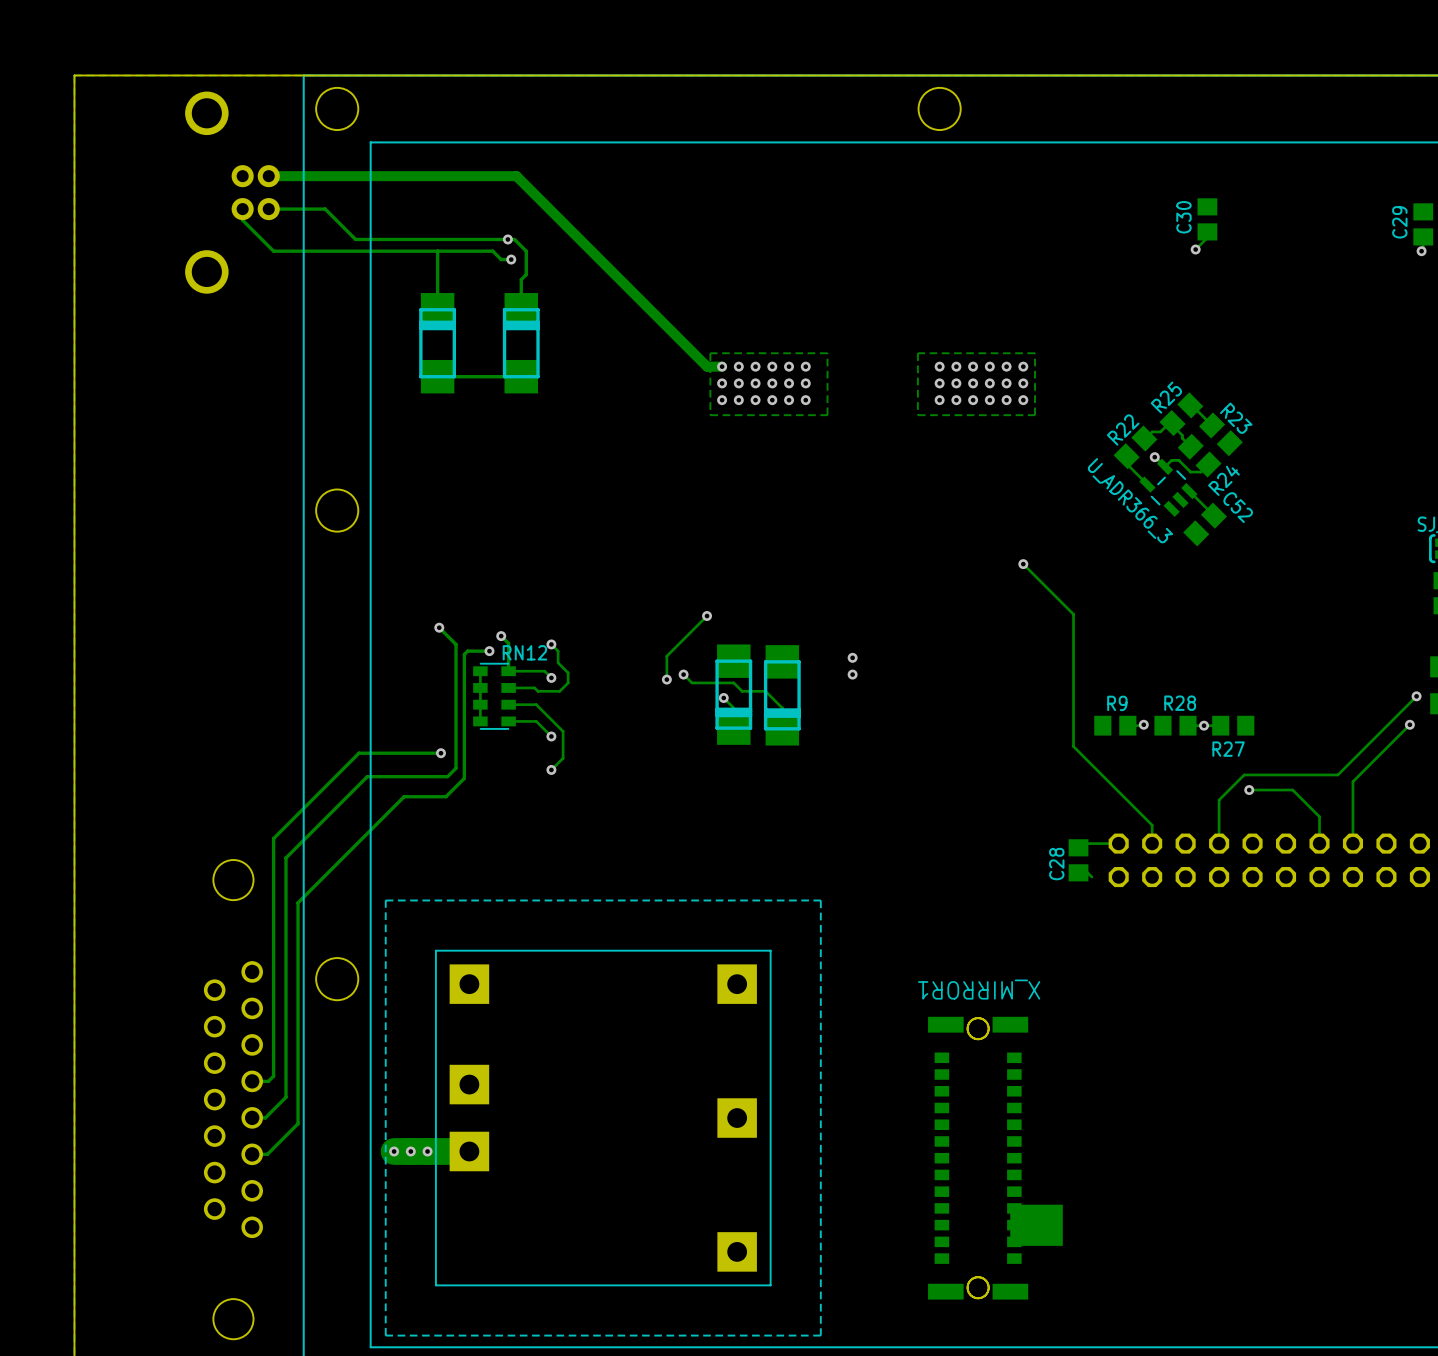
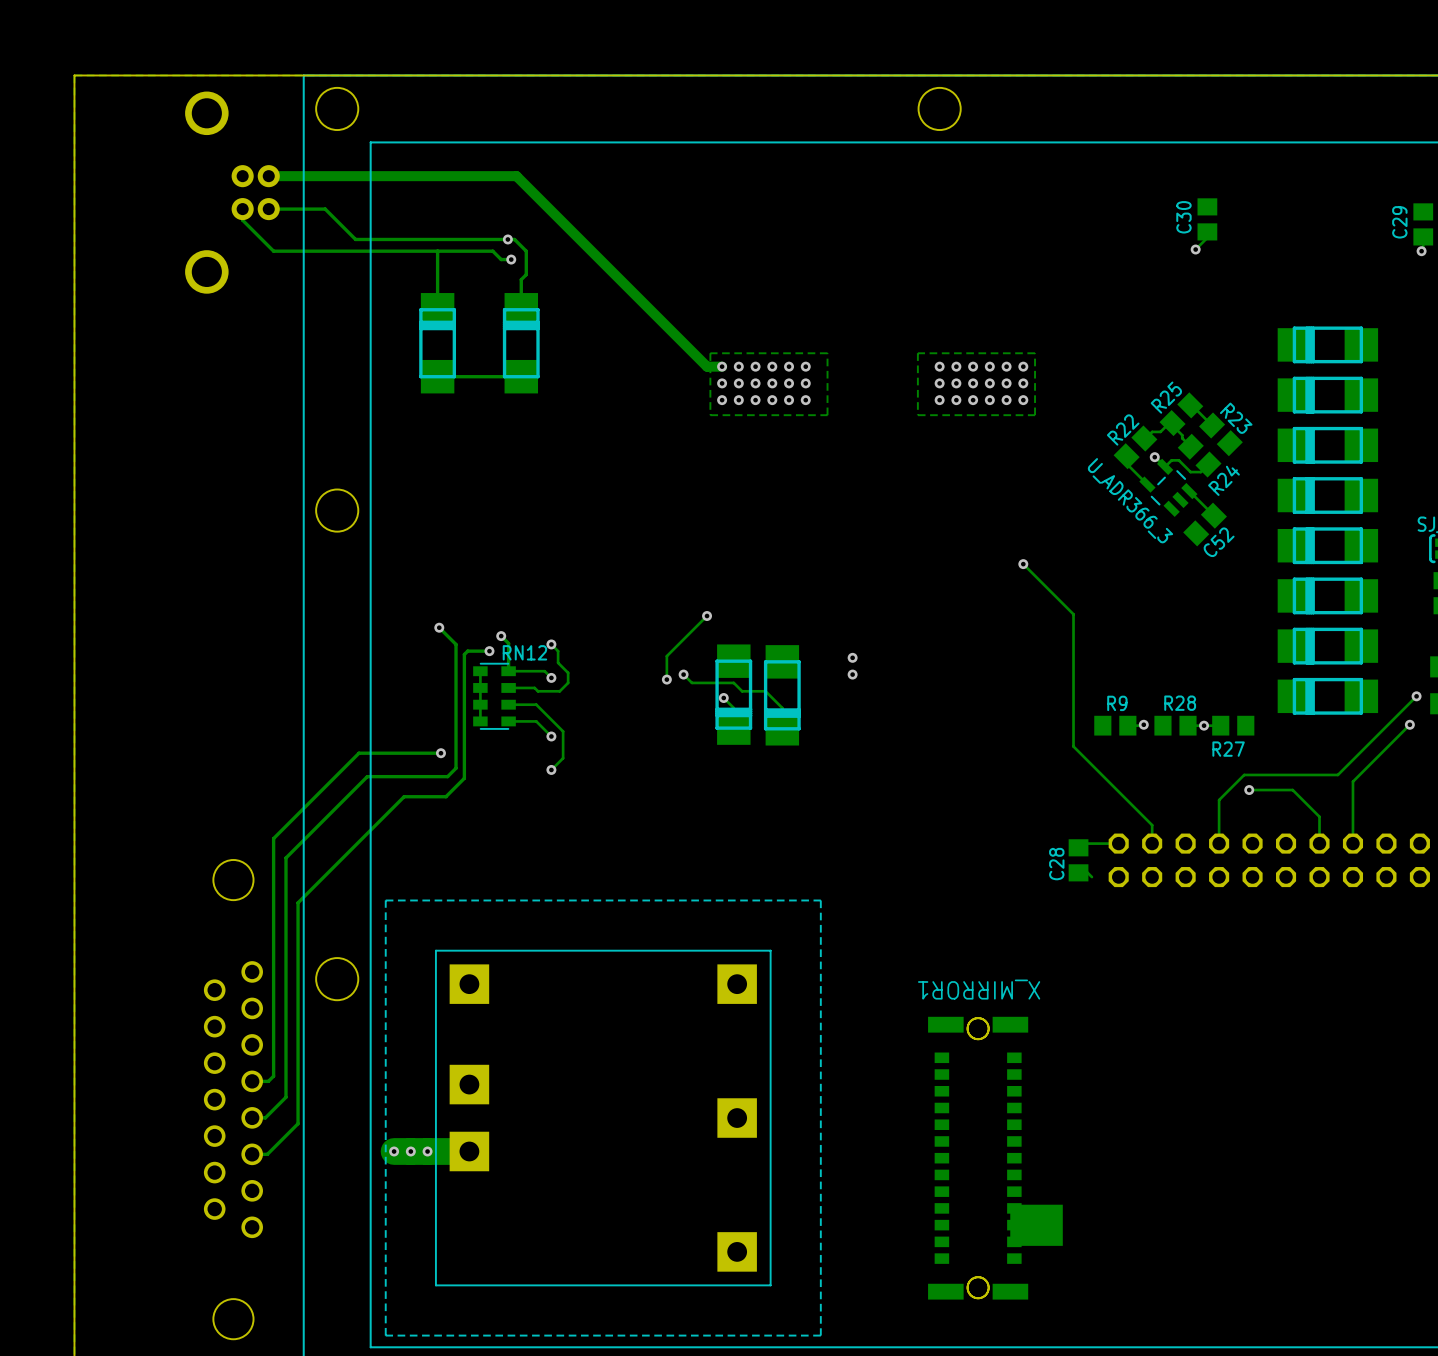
part: none -> (1327, 344)
part: none -> (1327, 395)
part: none -> (1327, 445)
part: none -> (1327, 495)
C52 name rotation: 0° (1238, 507) -> 90° counterclockwise (1219, 542)
part: none -> (1327, 545)
part: none -> (1327, 595)
part: none -> (1327, 646)
part: none -> (1327, 696)

